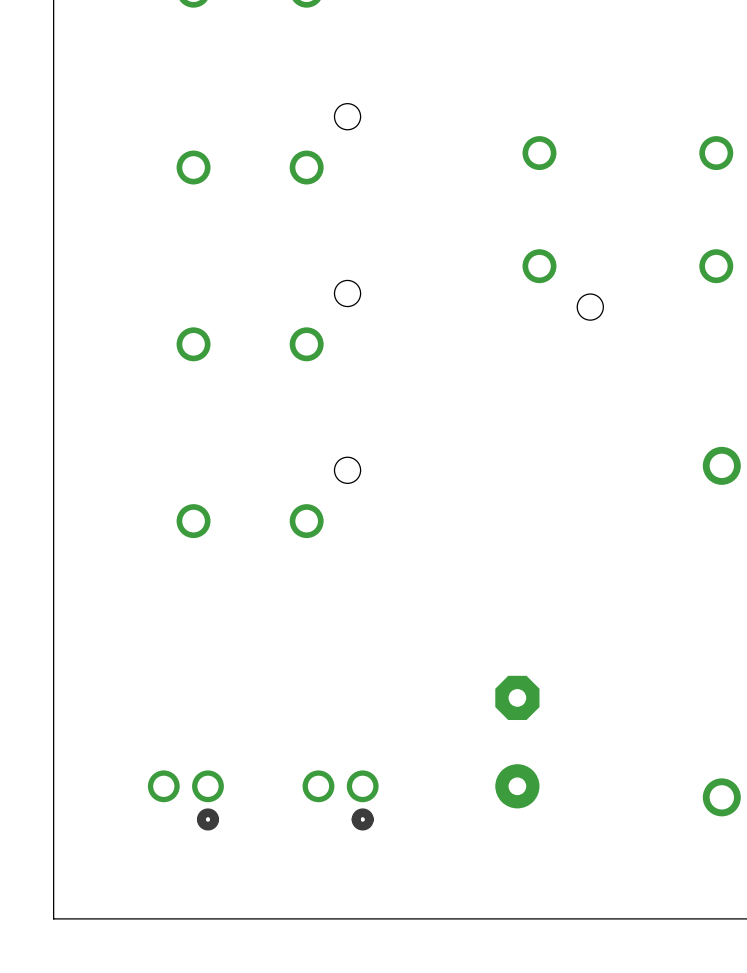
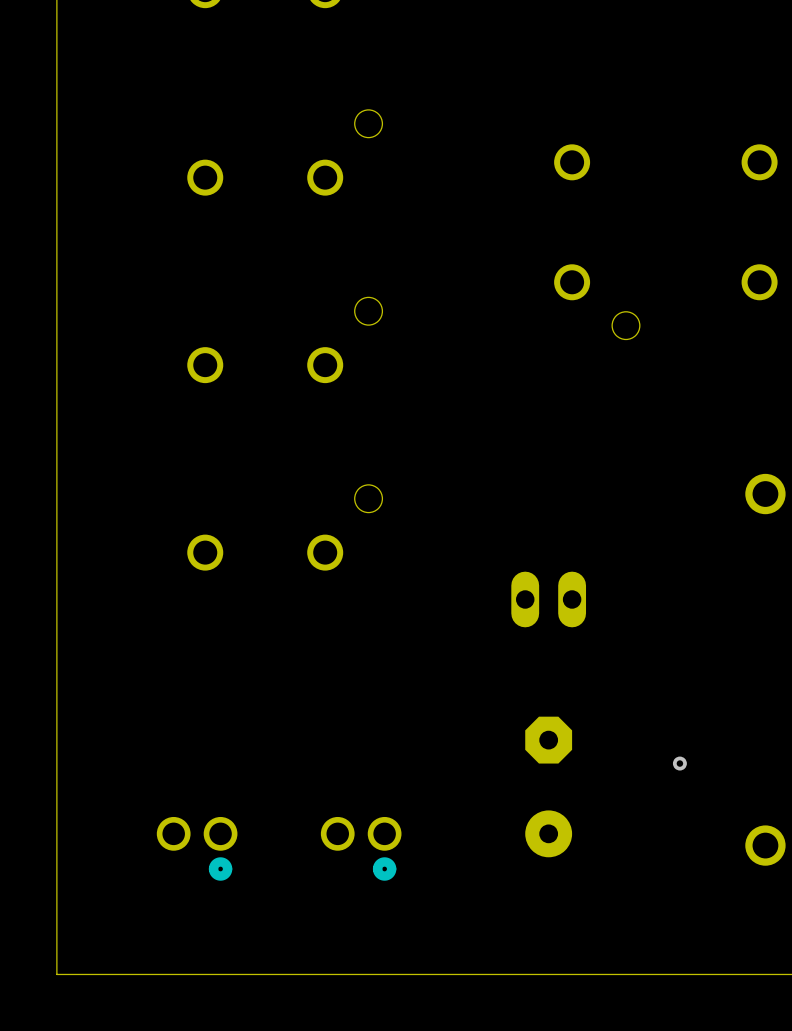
part: none -> (548, 599)
via: none -> (679, 763)

